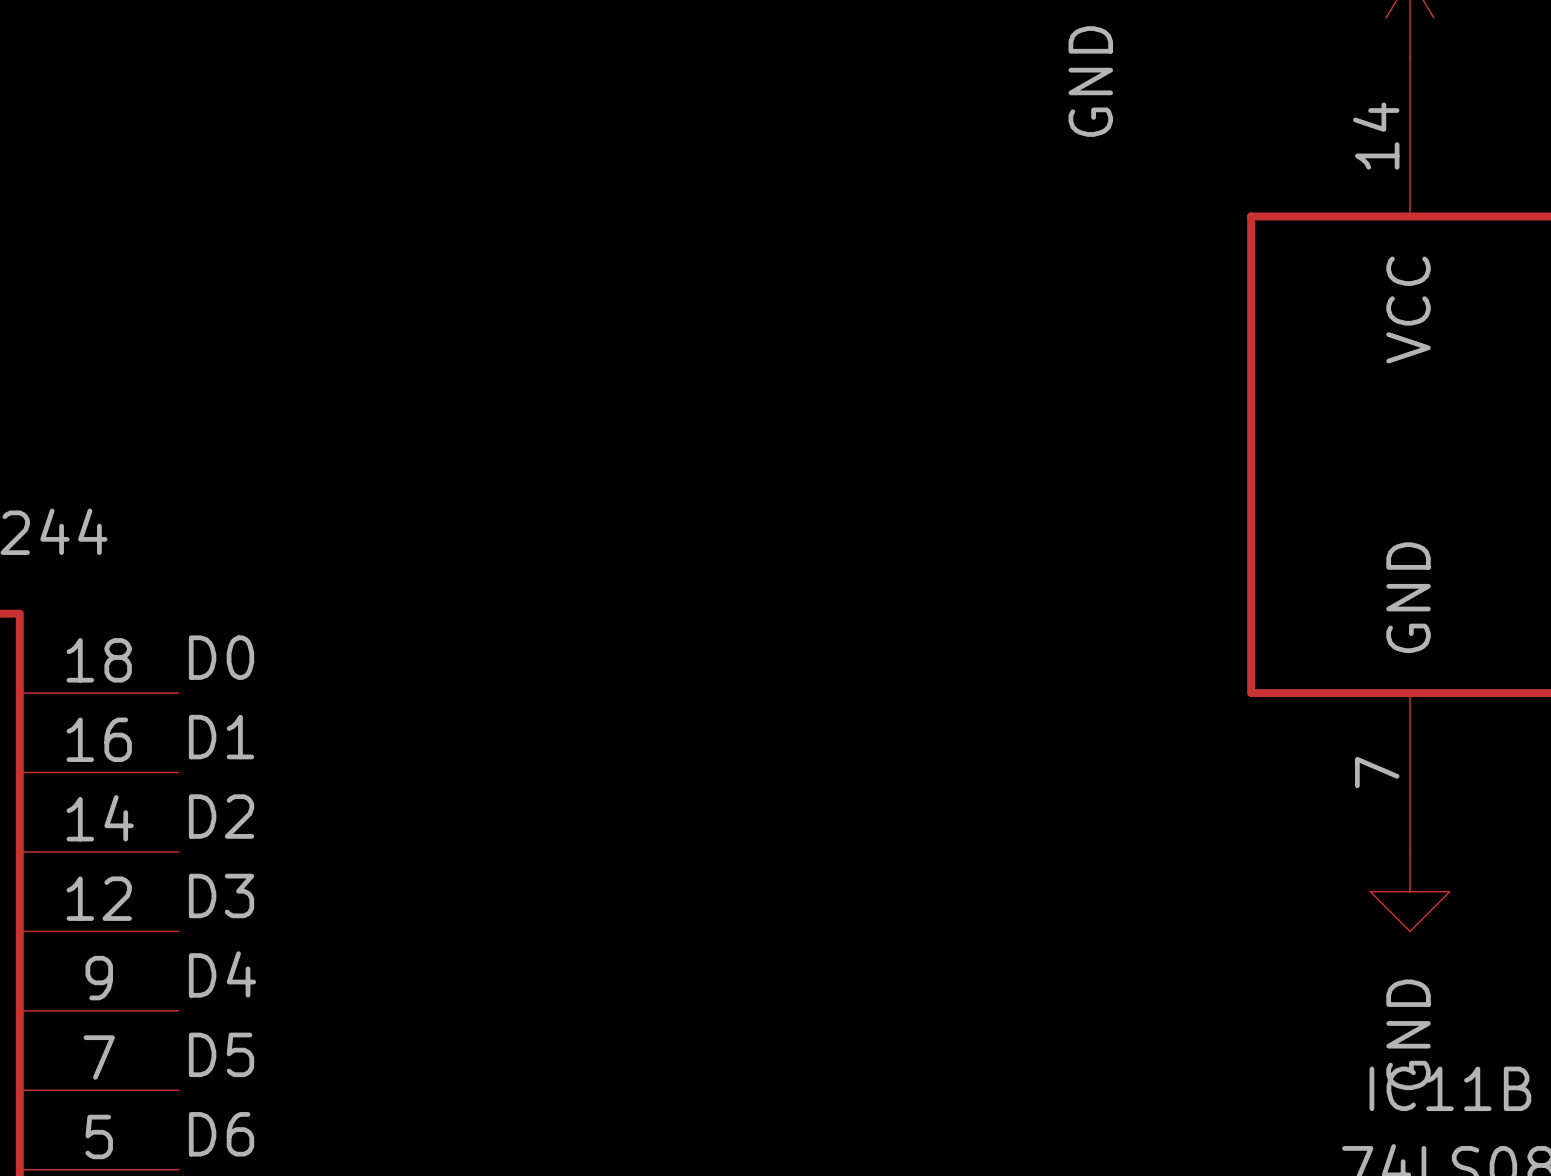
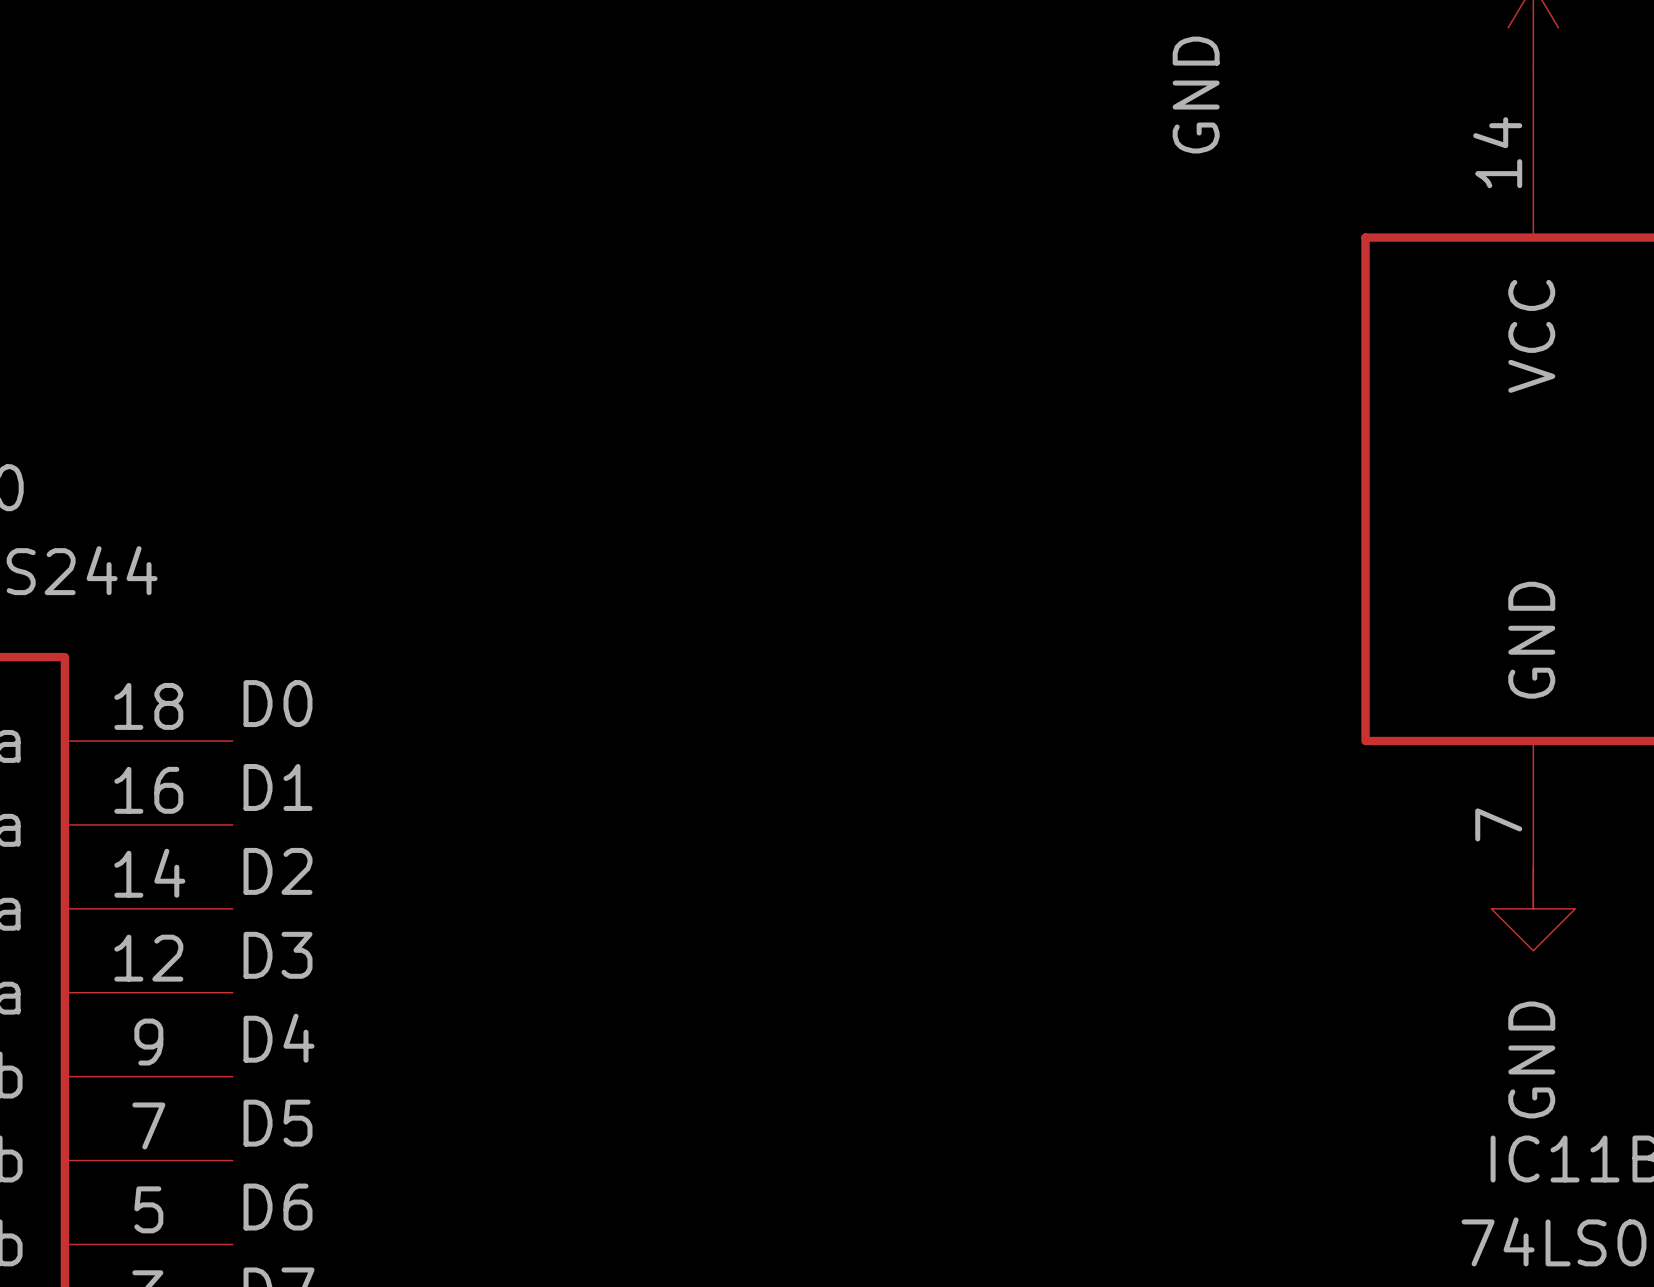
power symbol position: GND (1410, 891) -> GND (1533, 908)

